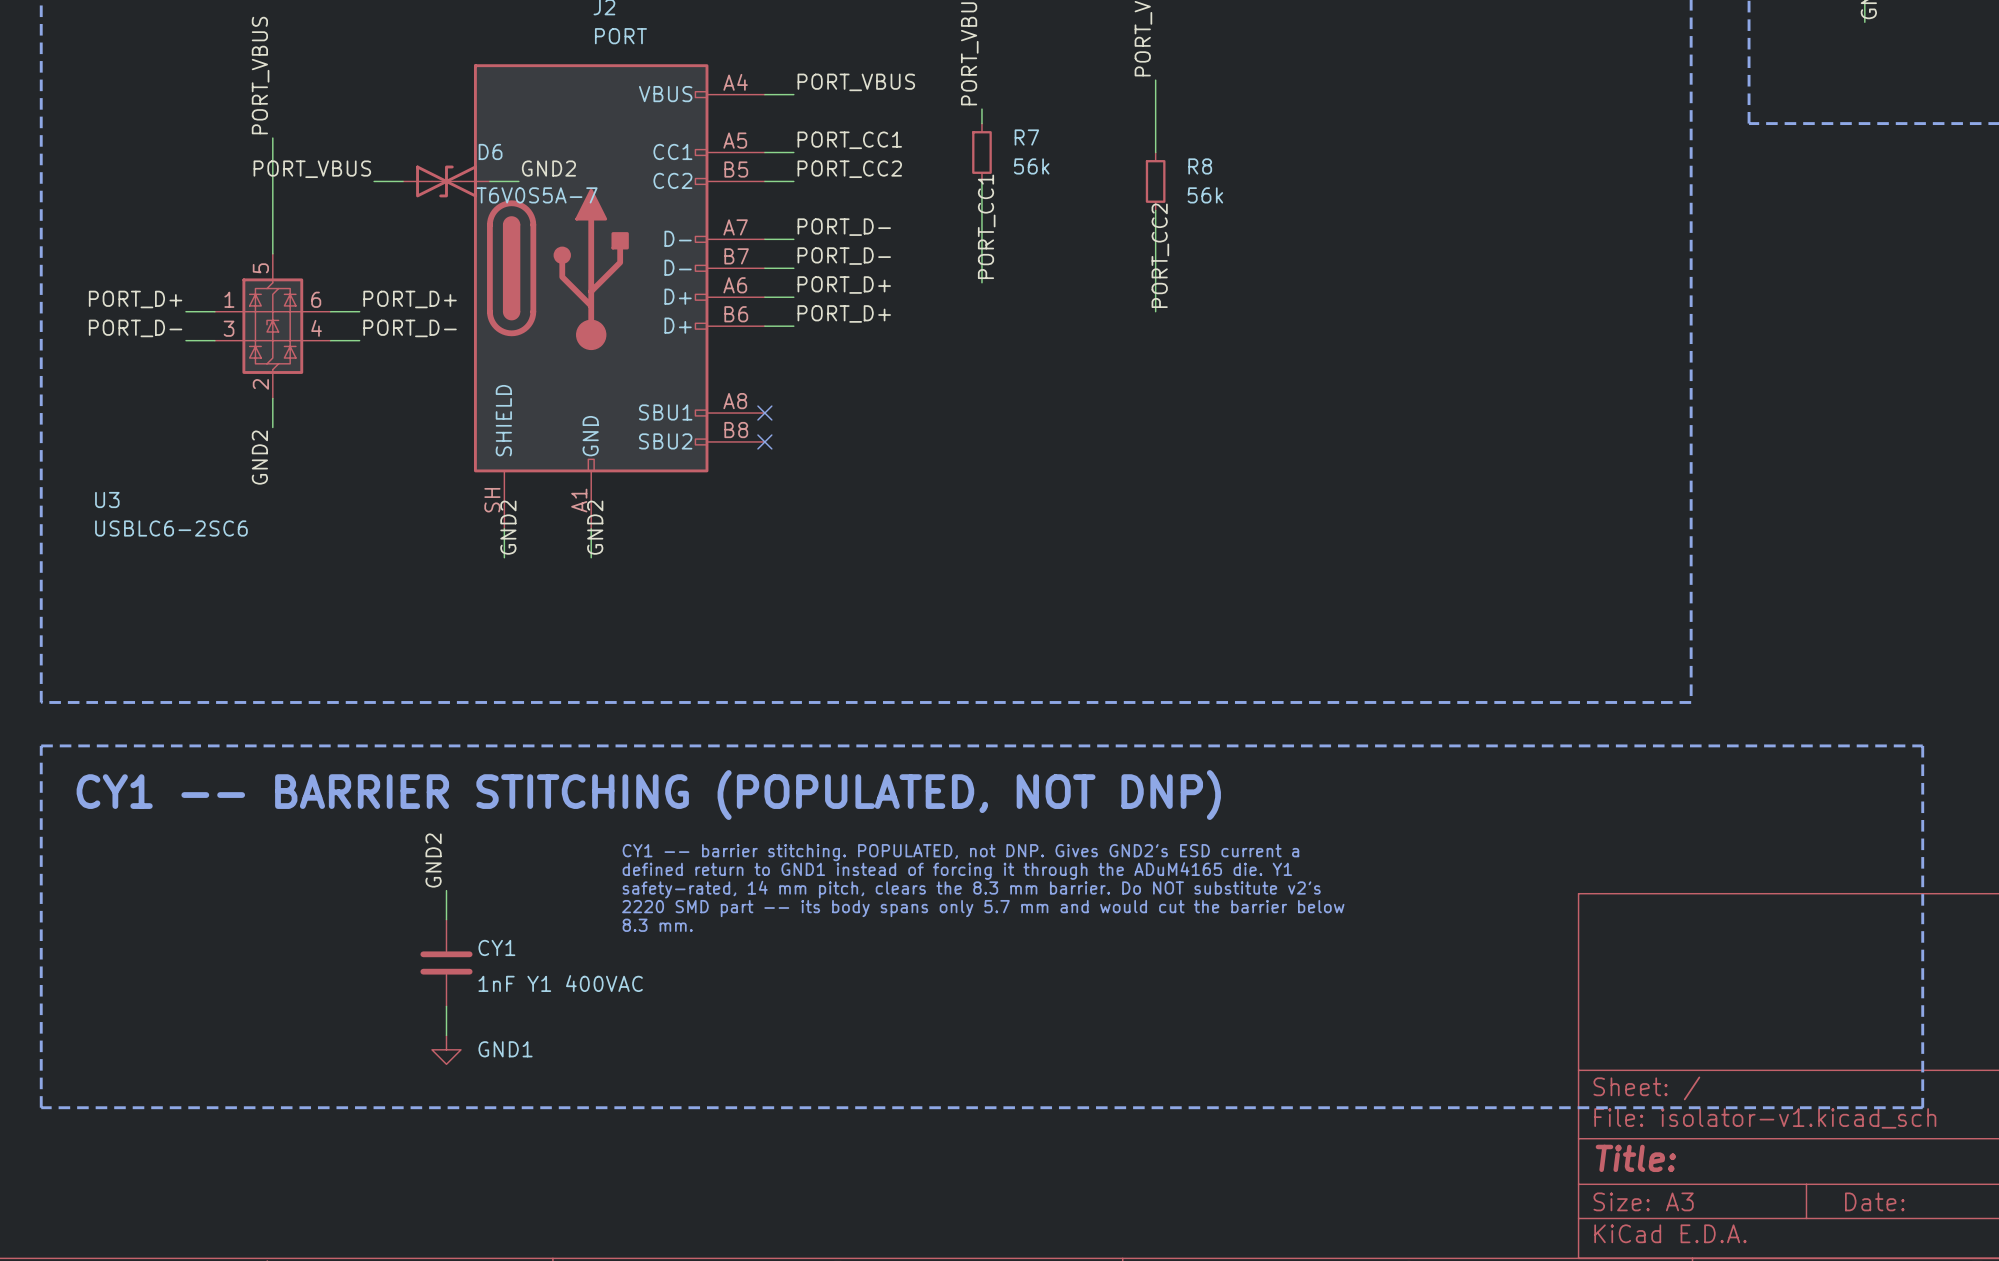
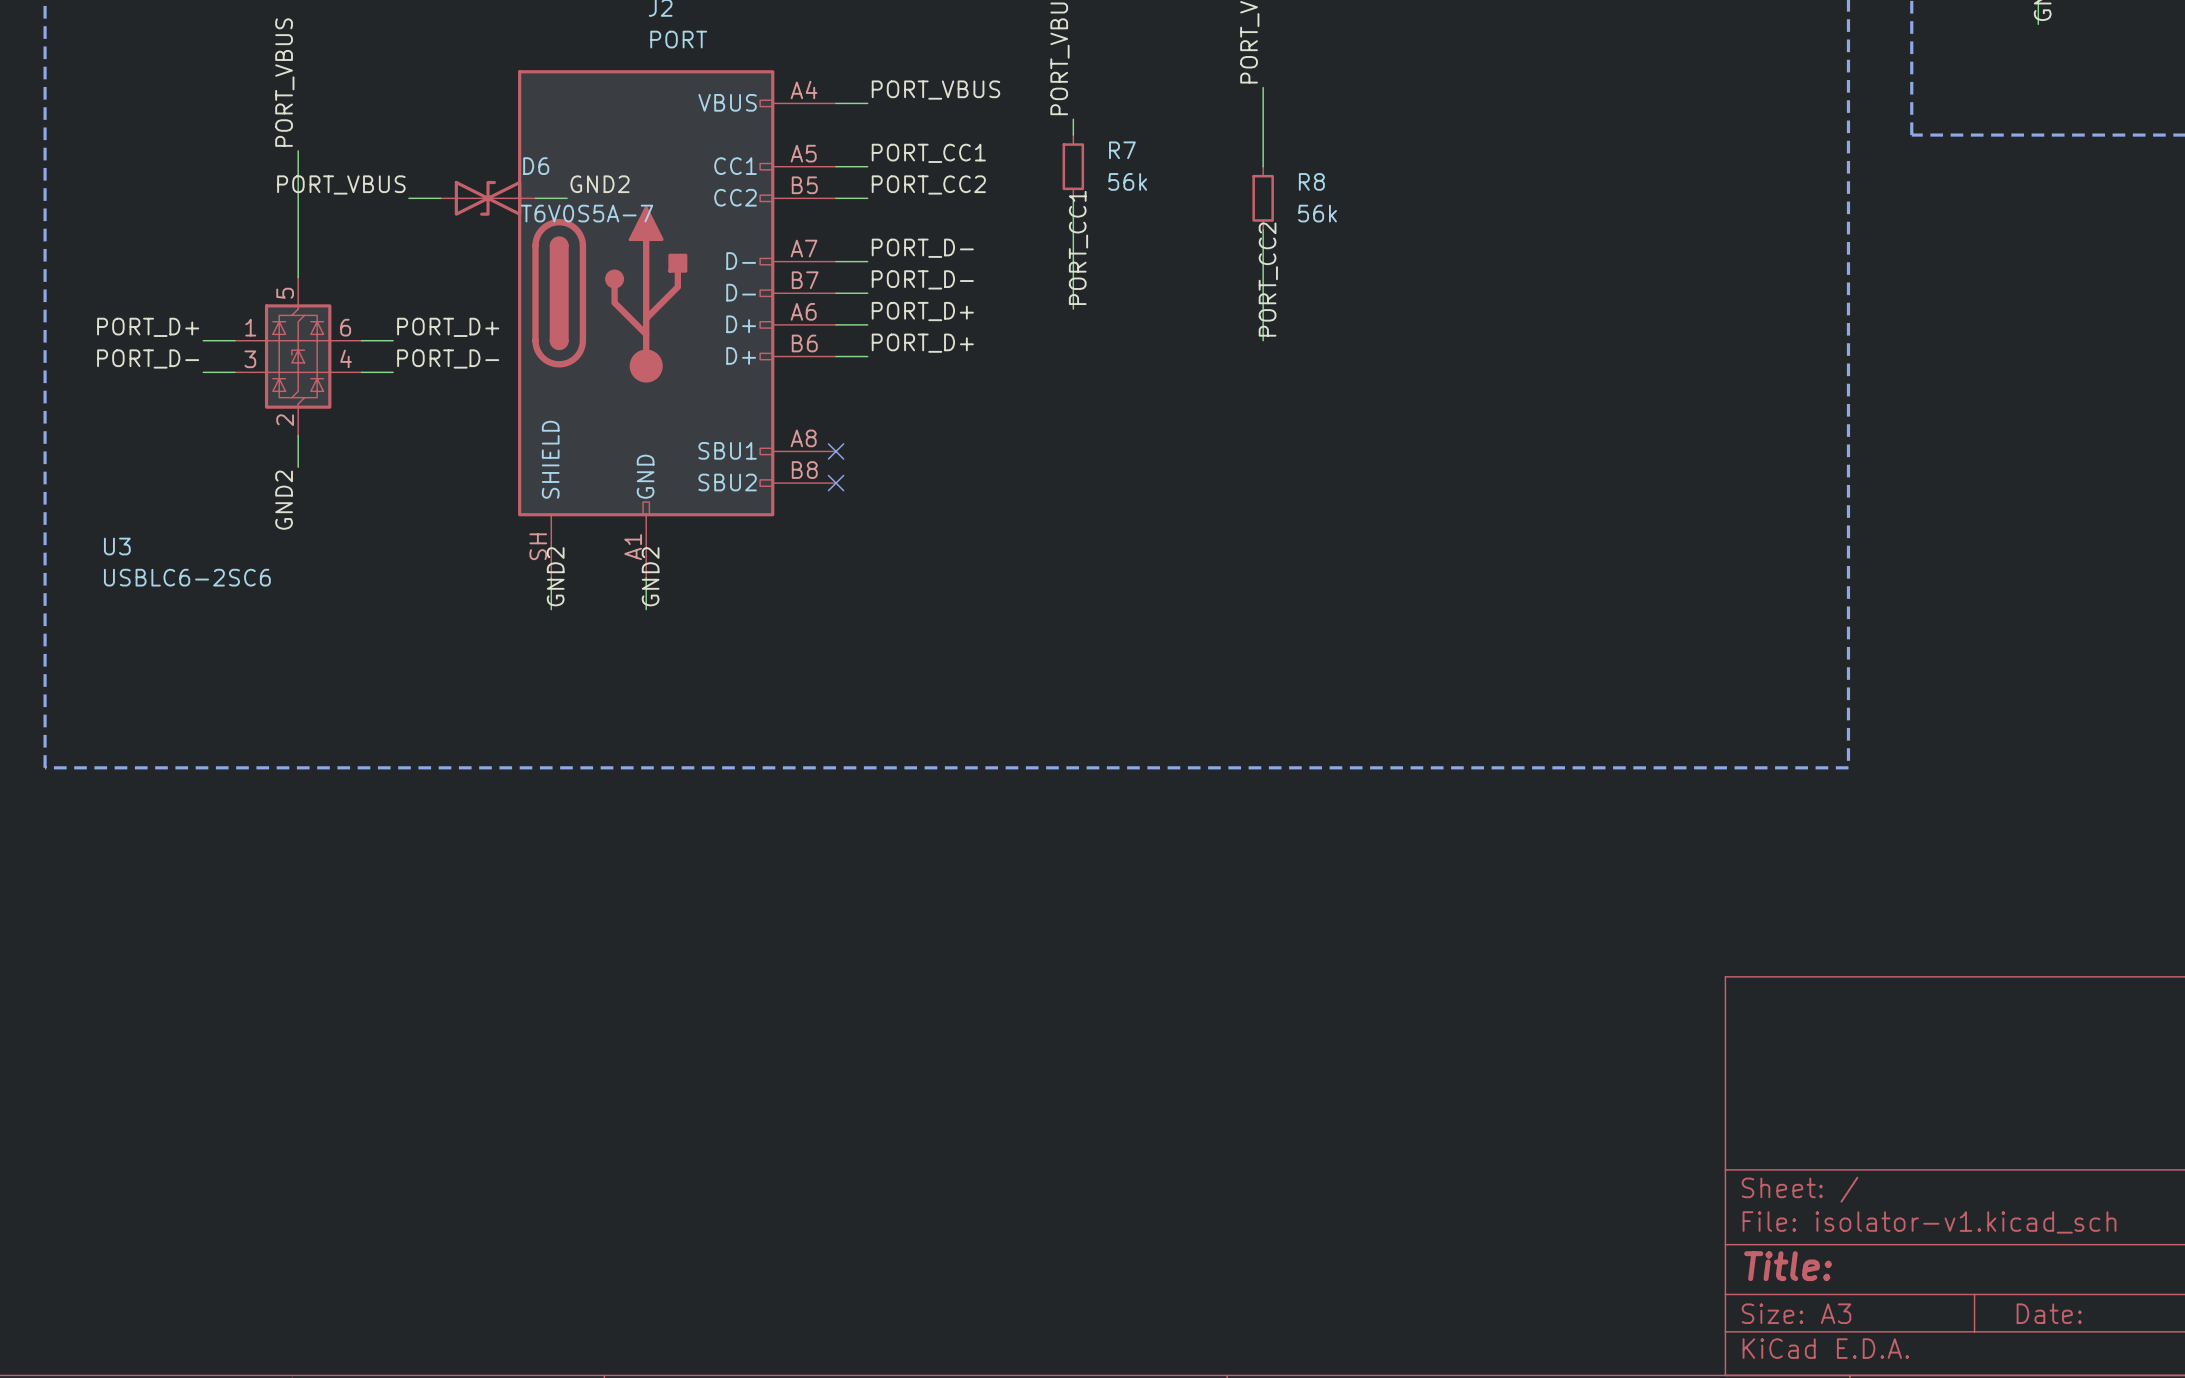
line: (41, 745) (1922, 745) (1922, 1107) (41, 1107) (41, 745) -> none
text: CY1 -- BARRIER STITCHING (POPULATED, NOT DNP) (648, 795) -> none
text: CY1 -- barrier stitching. POPULATED, not DNP. Gives GND2's ESD current a (960, 852) -> none
label: GND2 (433, 860) -> none
text: defined return to GND1 instead of forcing it through the ADuM4165 die. Y1 (957, 870) -> none
text: safety-rated, 14 mm pitch, clears the 8.3 mm barrier. Do NOT substitute v2's (971, 889) -> none
wire: (446, 890) (446, 919) -> none
text: 2220 SMD part -- its body spans only 5.7 mm and would cut the barrier below (983, 908) -> none
text: 8.3 mm. (657, 925) -> none
CY1: 1nF Y1 400VAC (446, 962) -> none
wire: (446, 1006) (446, 1035) -> none
power symbol: GND1 (446, 1049) -> none

